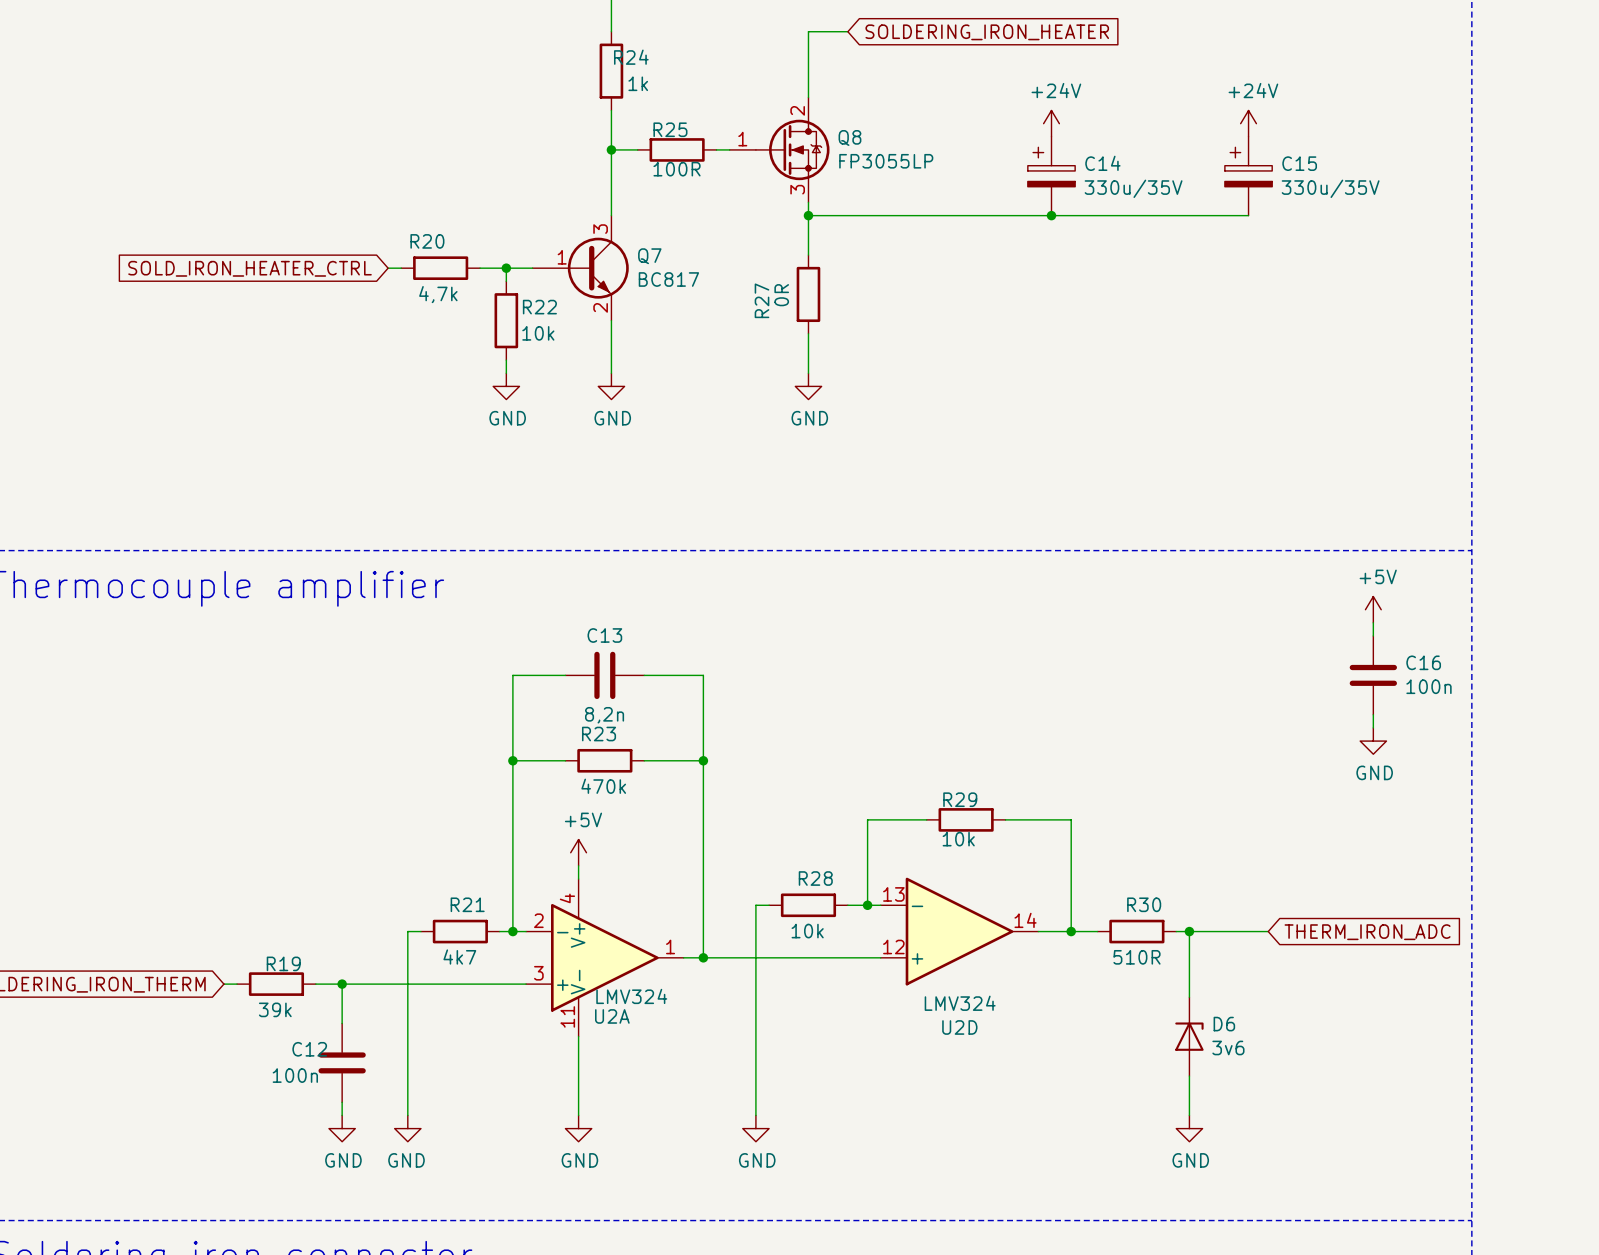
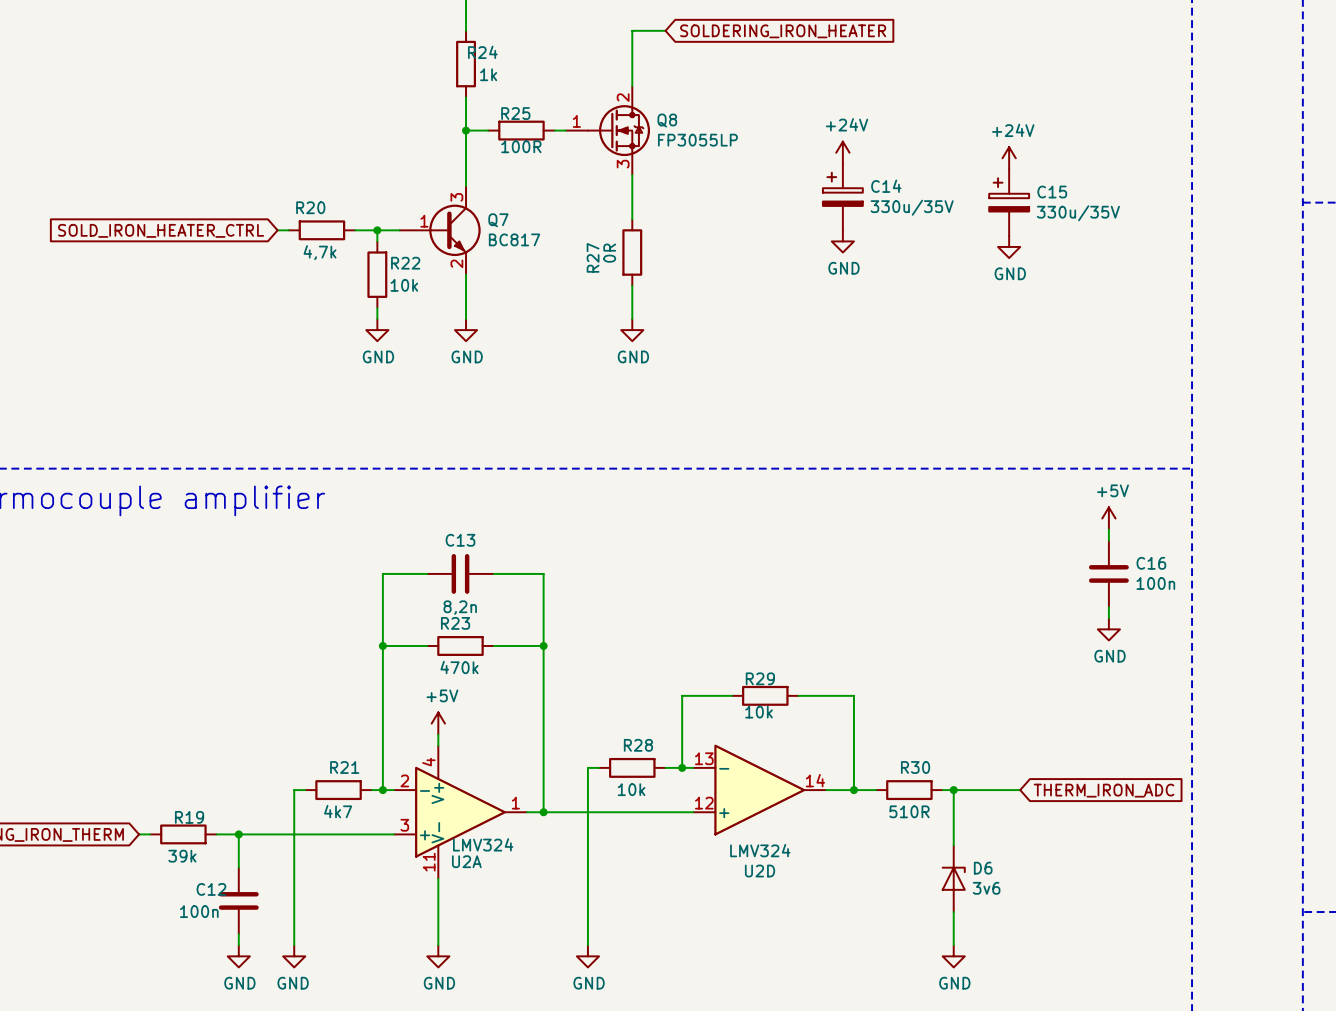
power symbol position: +24V (1051, 123) -> +24V (842, 152)
power symbol position: +24V (1248, 123) -> +24V (1009, 158)
C14 position: (1051, 176) -> (842, 197)
C15 position: (1248, 176) -> (1009, 202)
wire: (808, 215) (1248, 215) -> none
junction: (808, 215) -> none
junction: (1051, 215) -> none
power symbol: none -> GND (842, 241)
power symbol: none -> GND (1009, 246)

